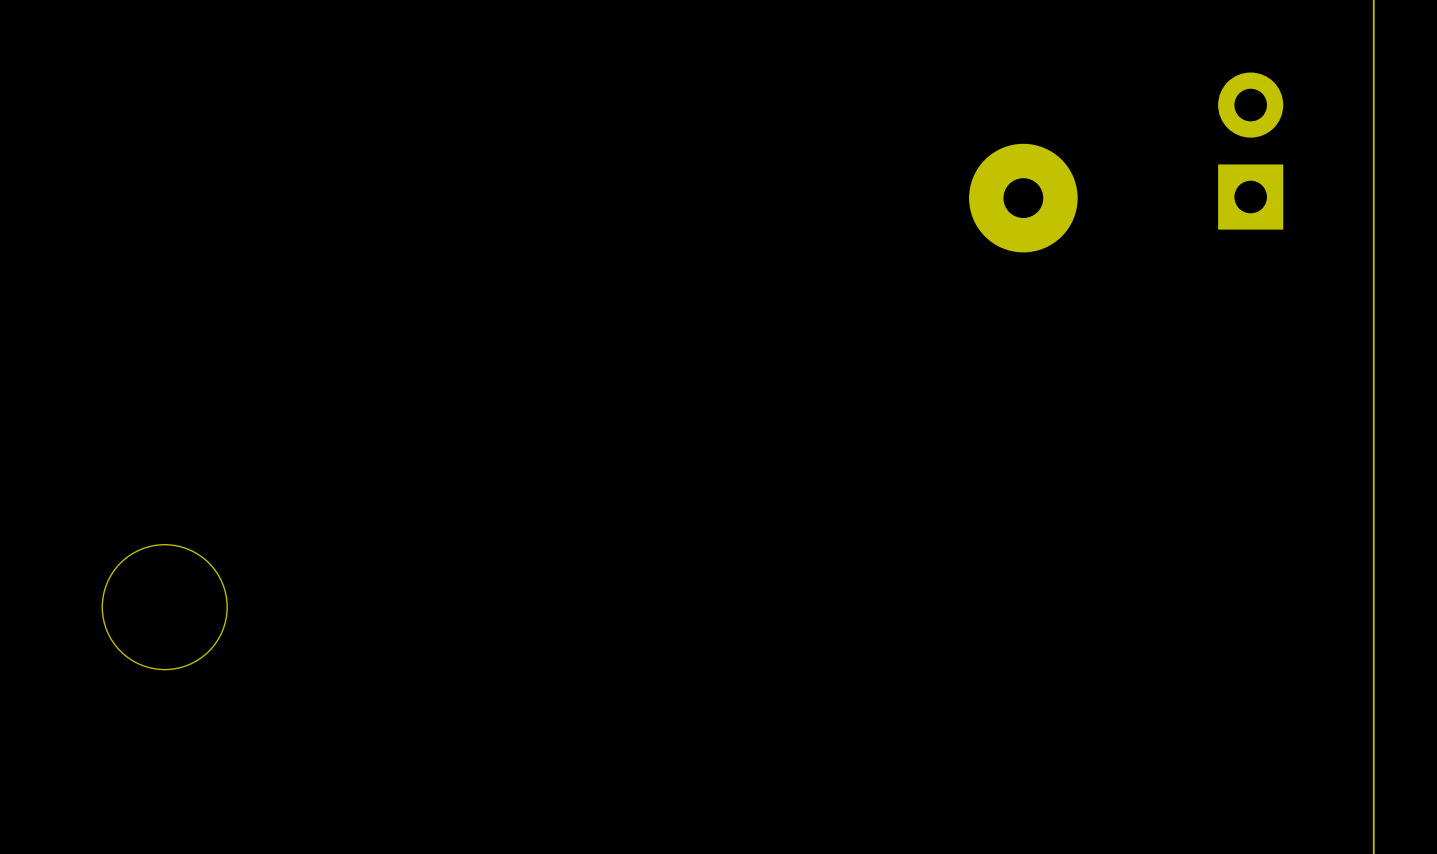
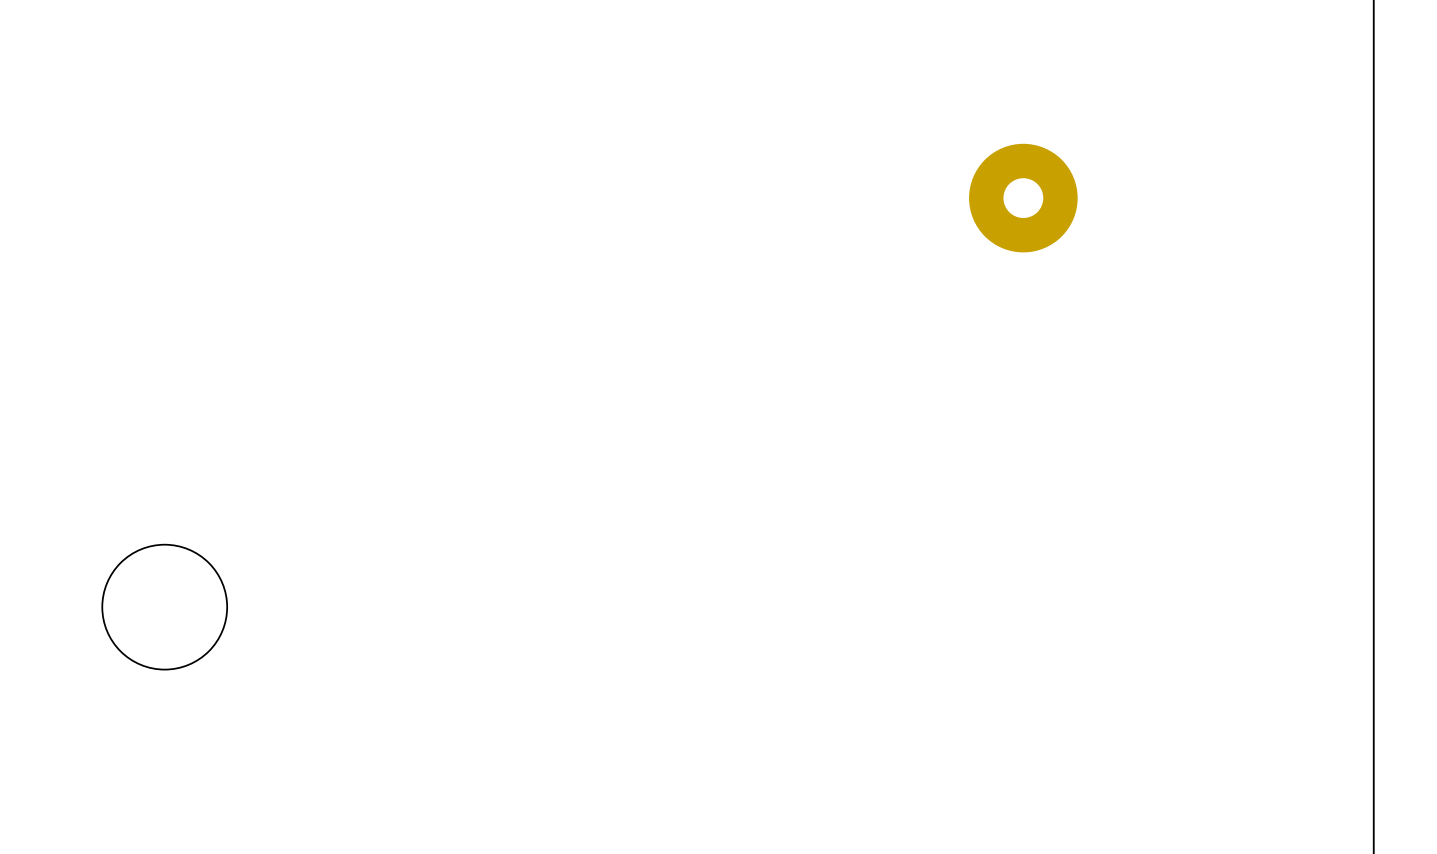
part: (1250, 151) -> none

